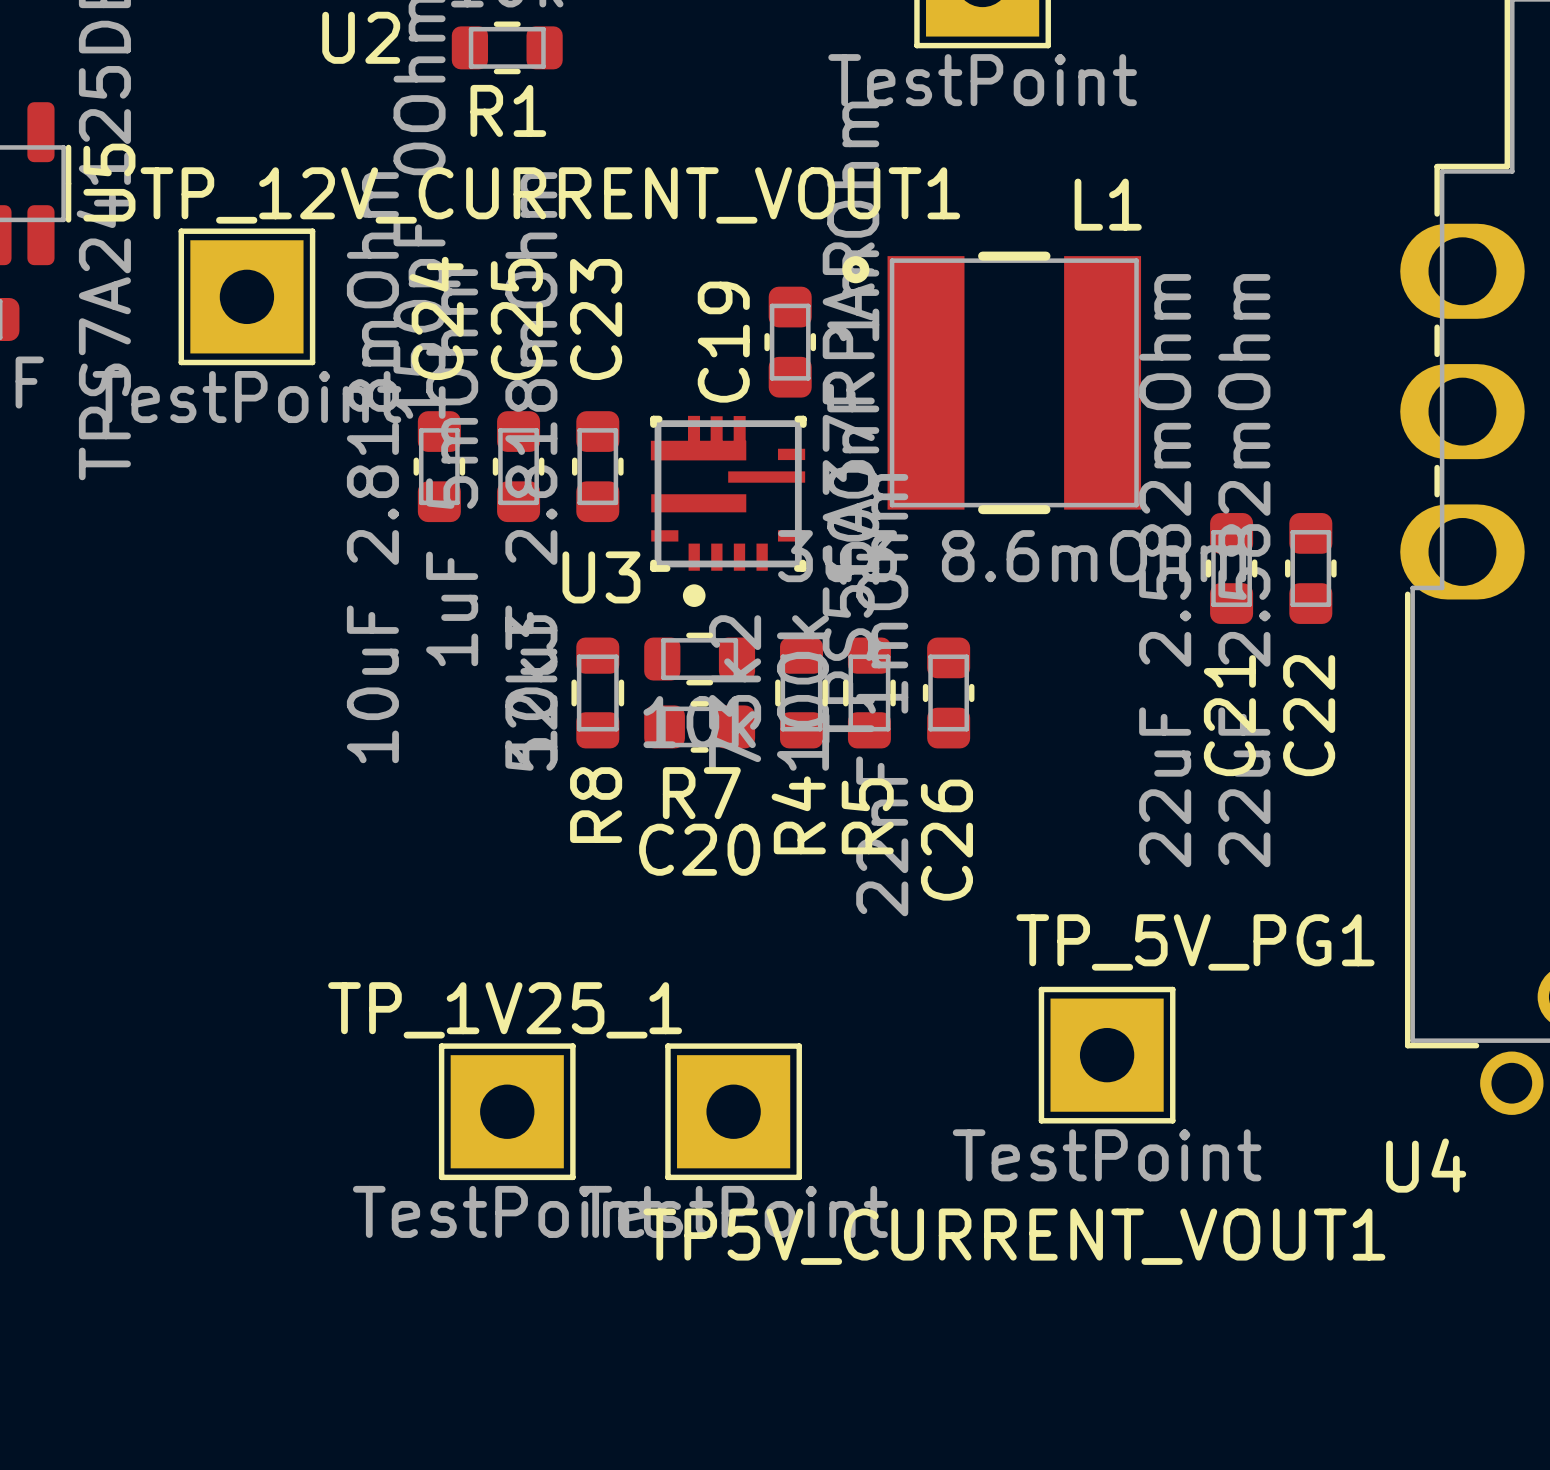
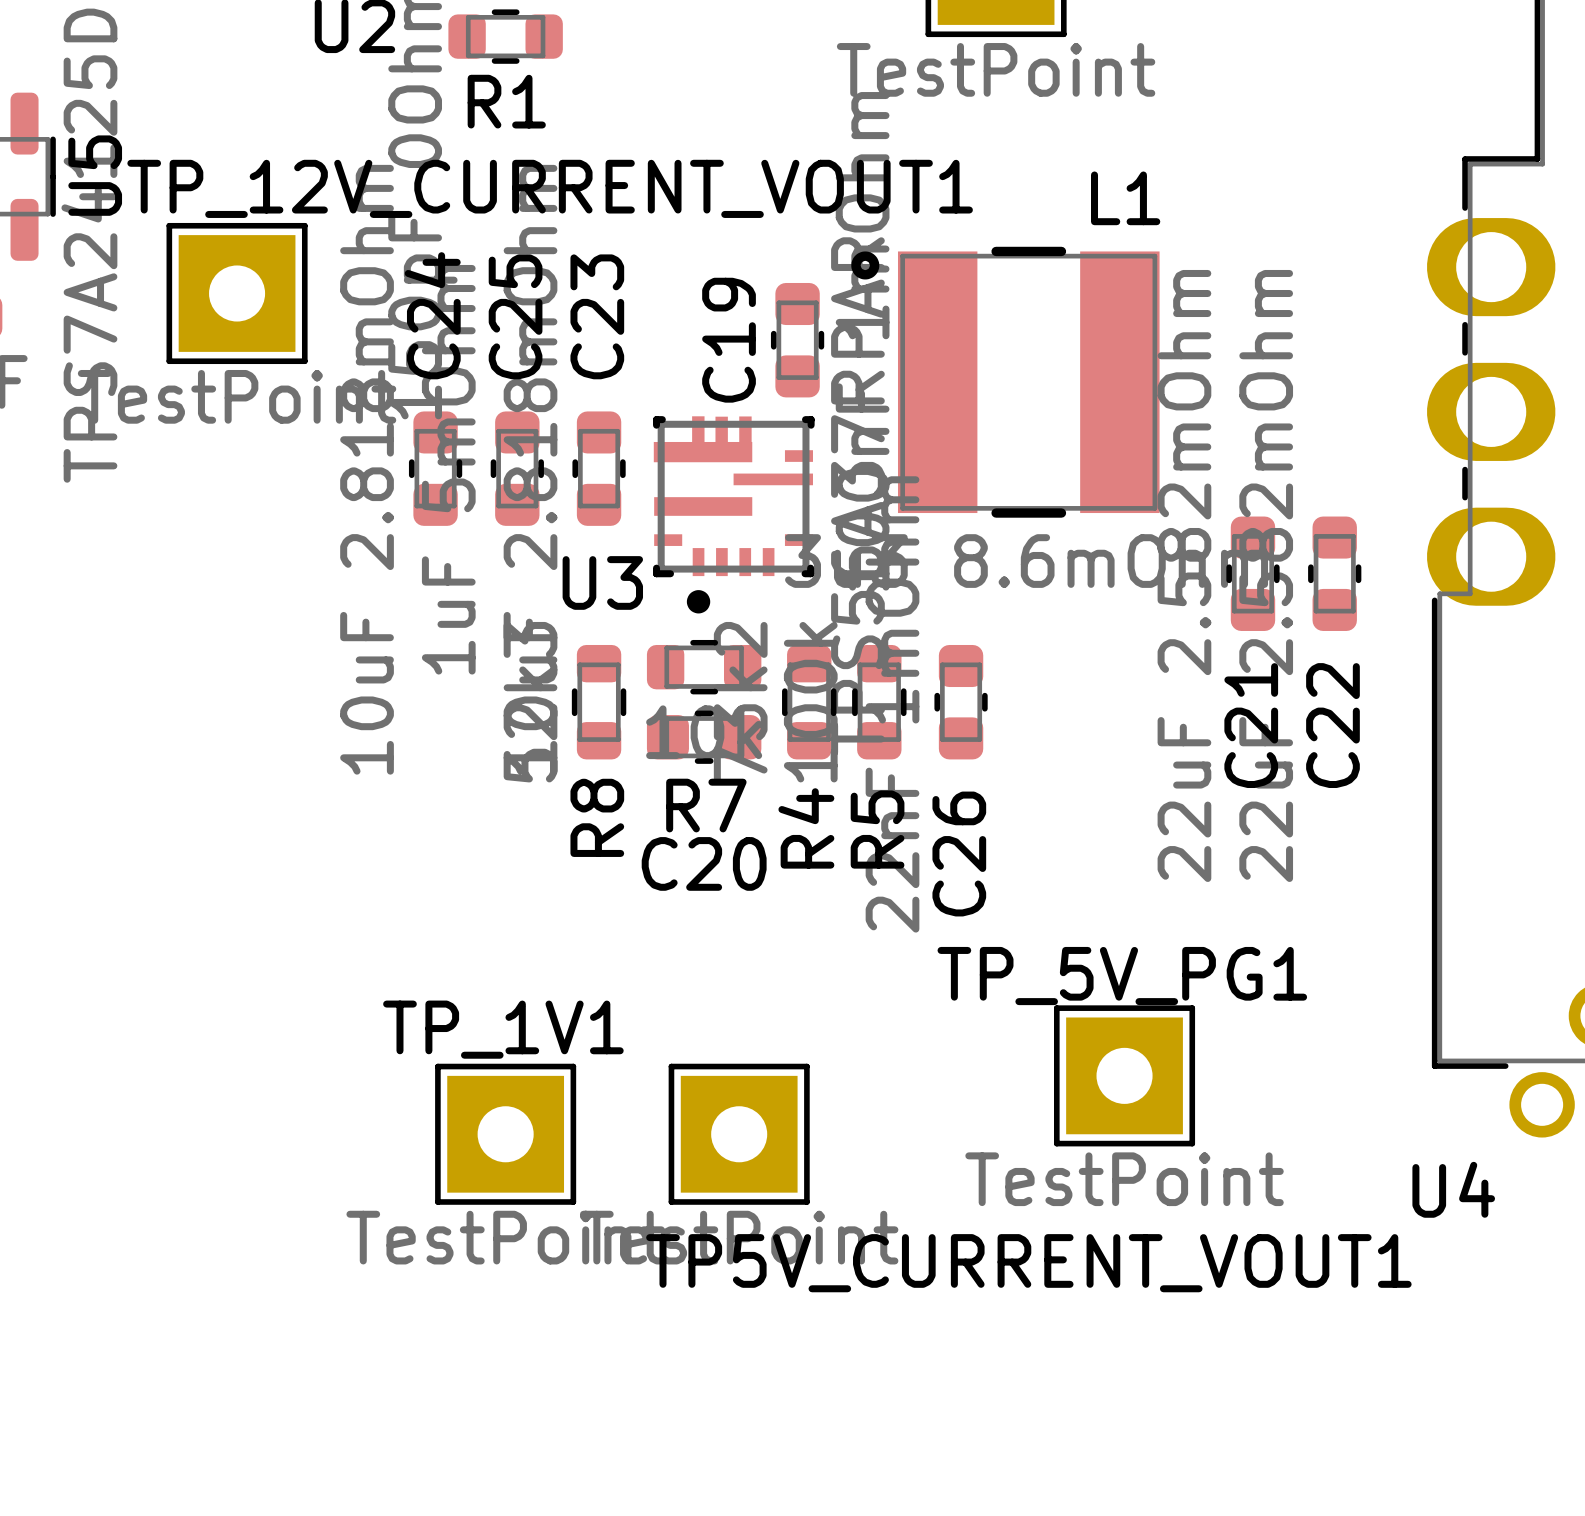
TP_5V_PG1 name position: TP_5V_PG1 (1195, 942) -> TP_5V_PG1 (1122, 976)
TP_1V25_1 name: TP_1V25_1 (505, 1010) -> TP_1V1 (503, 1029)

